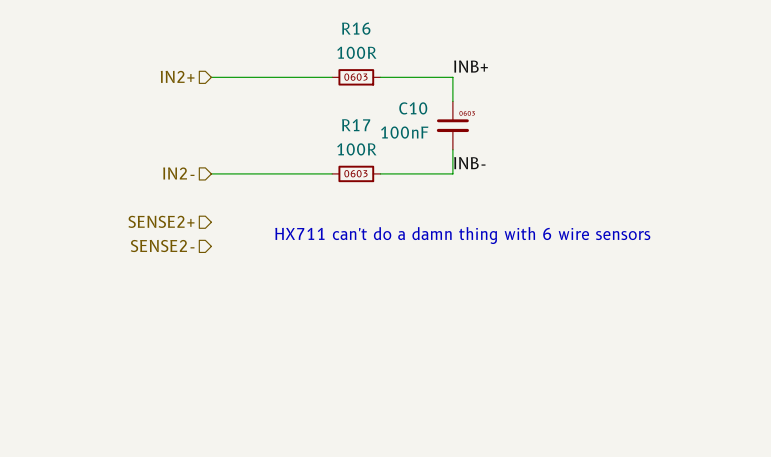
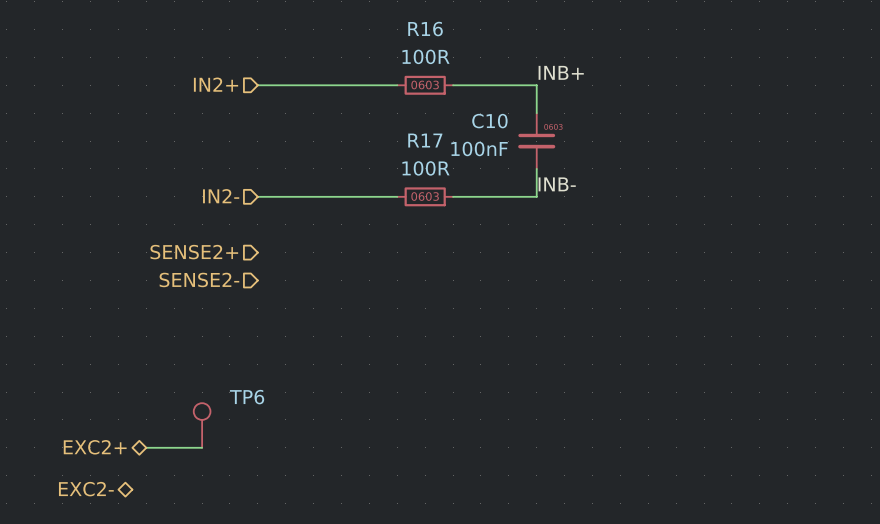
text: HX711 can't do a damn thing with 6 wire sensors (462, 235) -> none
TP6: none -> (202, 425)
hierarchical label: none -> EXC2+ (95, 447)
wire: none -> (146, 447) (202, 447)
hierarchical label: none -> EXC2- (86, 489)

